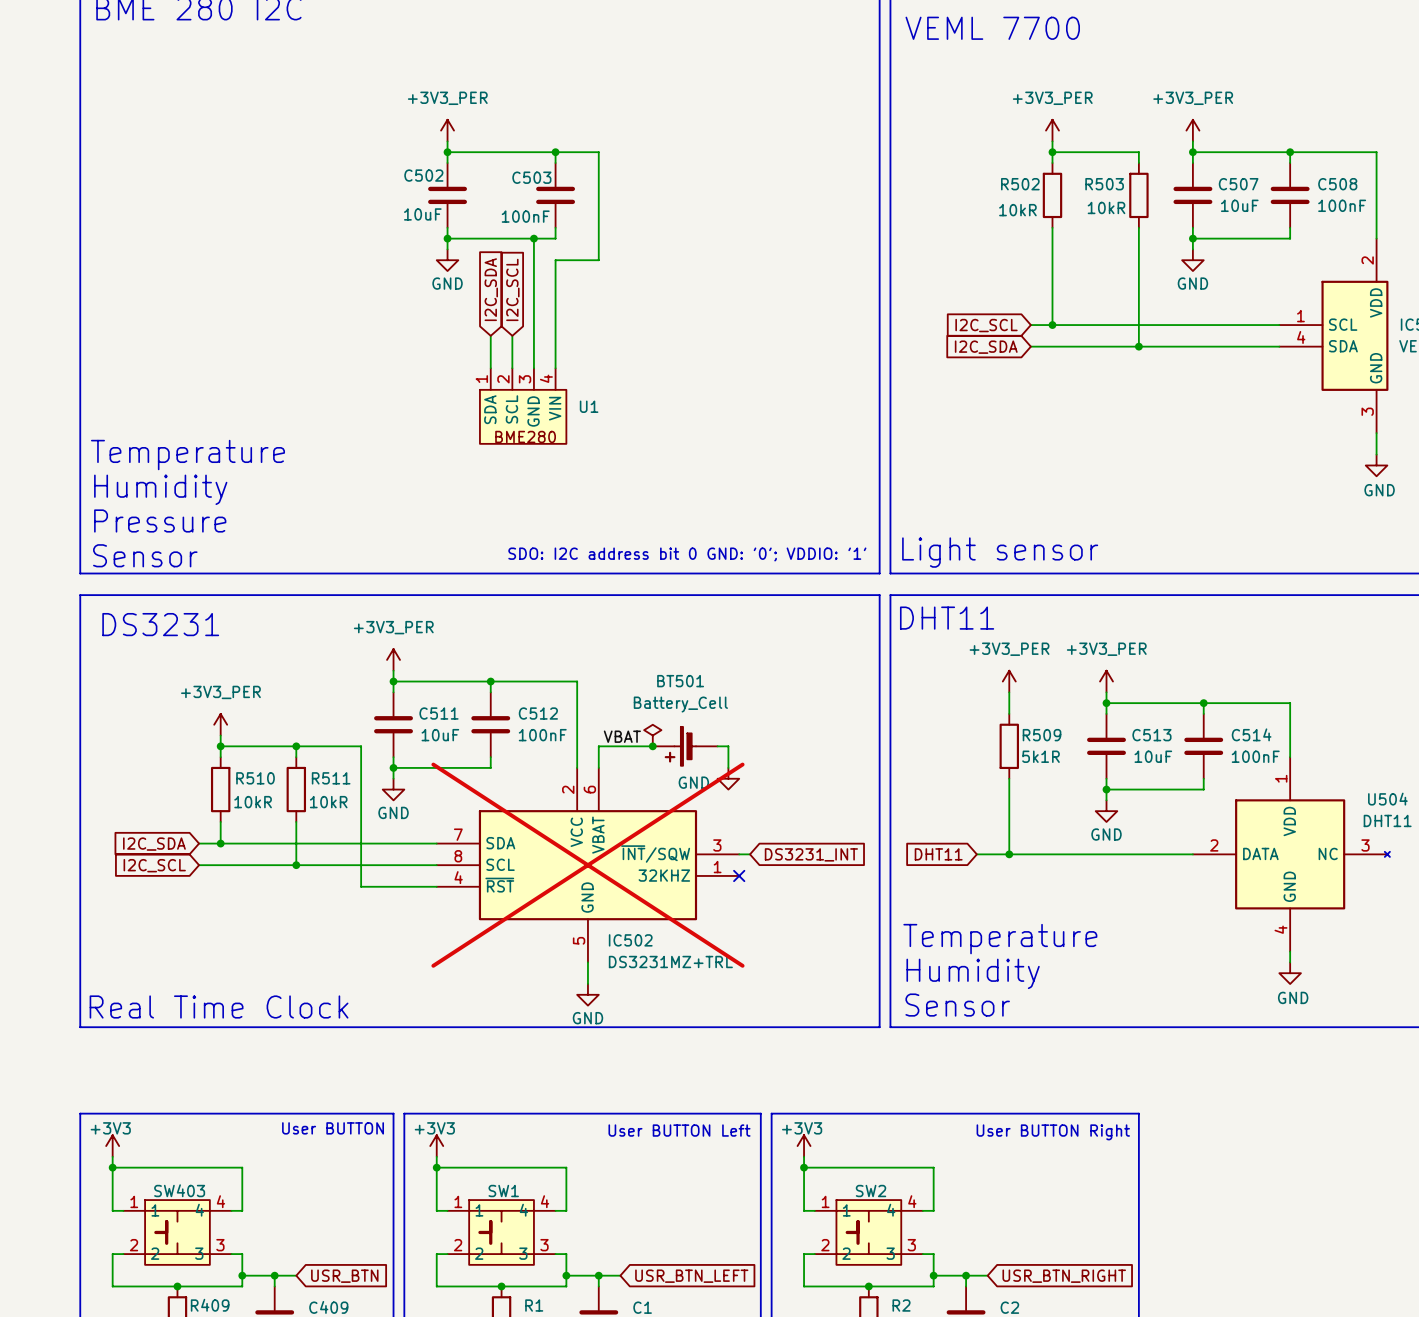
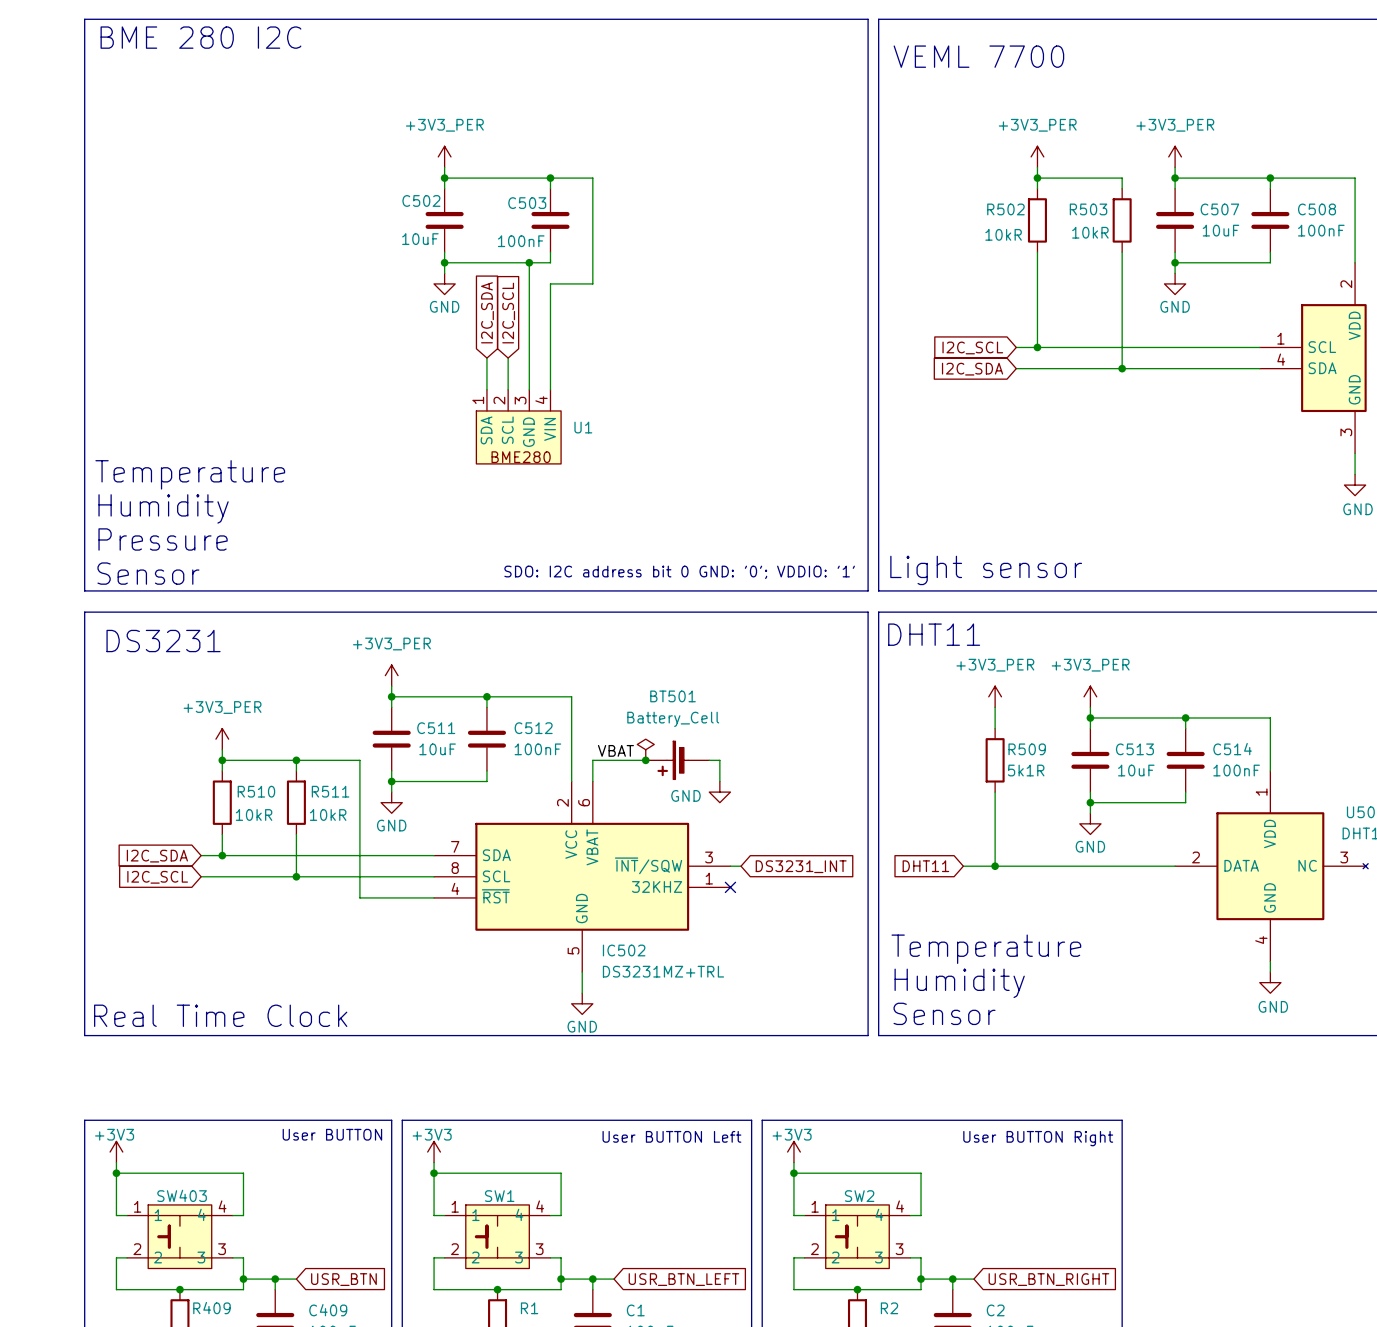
IC502 do-not-place cross: (587, 865) -> none

